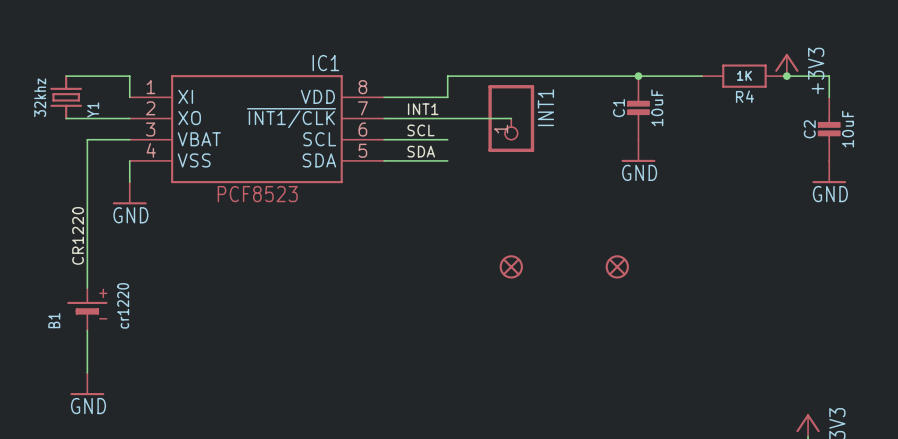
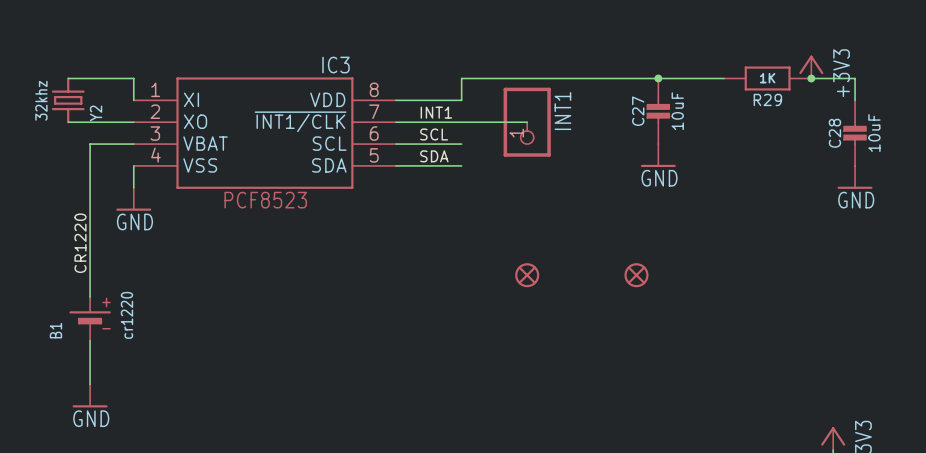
IC1 name: IC1 (325, 63) -> IC3 (336, 65)
R4 name: R4 (744, 96) -> R29 (767, 99)
C1 name: C1 (618, 108) -> C27 (638, 111)
Y1 name: Y1 (93, 109) -> Y2 (96, 113)
C2 name: C2 (809, 129) -> C28 (834, 133)

